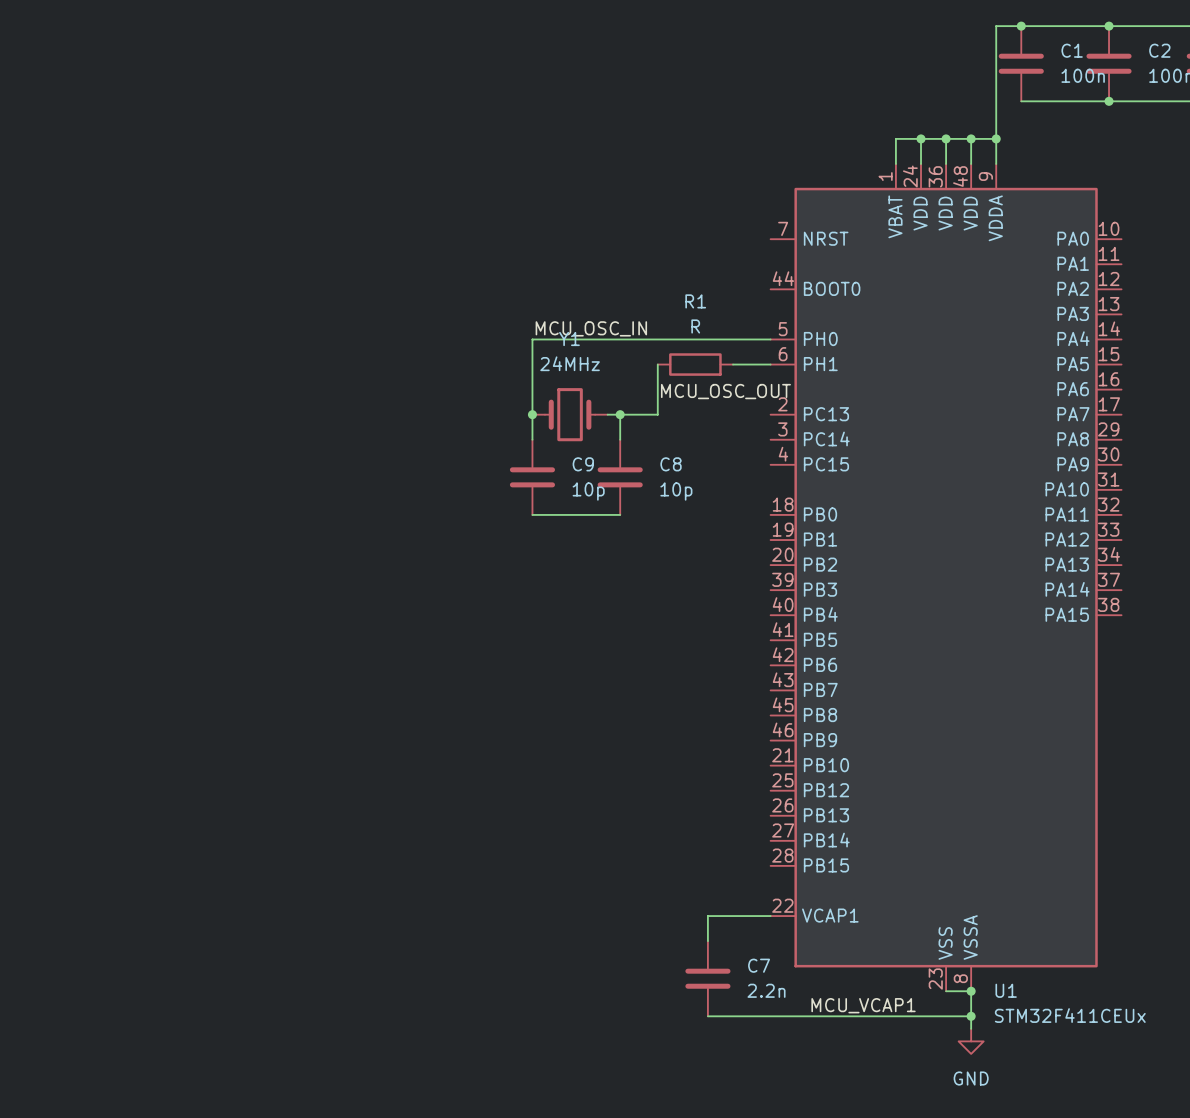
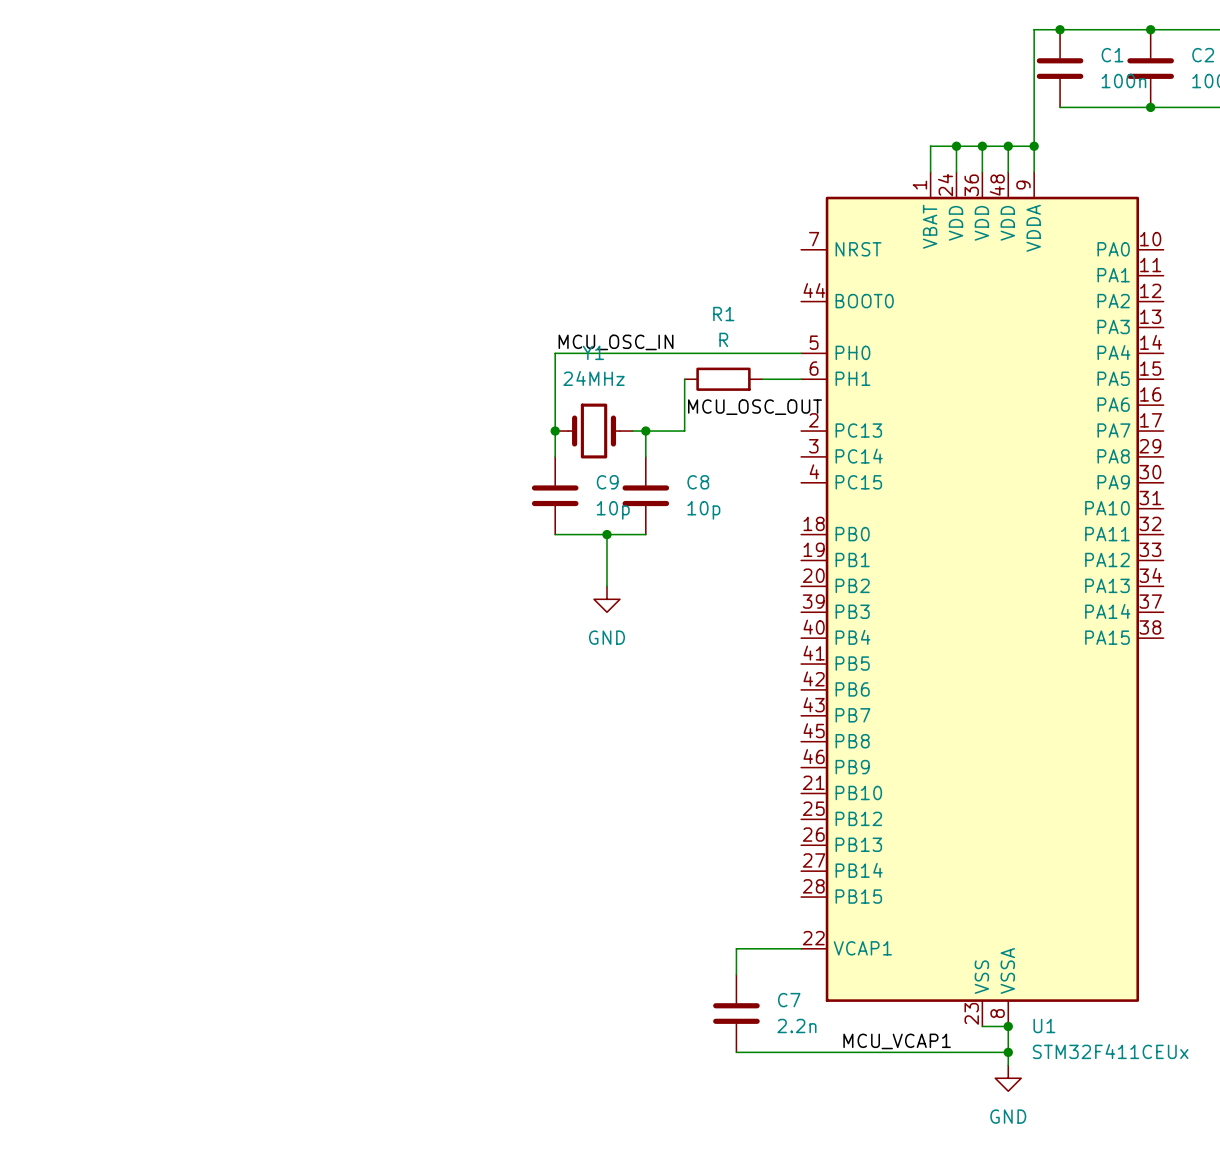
wire: none -> (606, 534) (606, 586)
junction: none -> (606, 534)
power symbol: none -> GND (606, 599)

